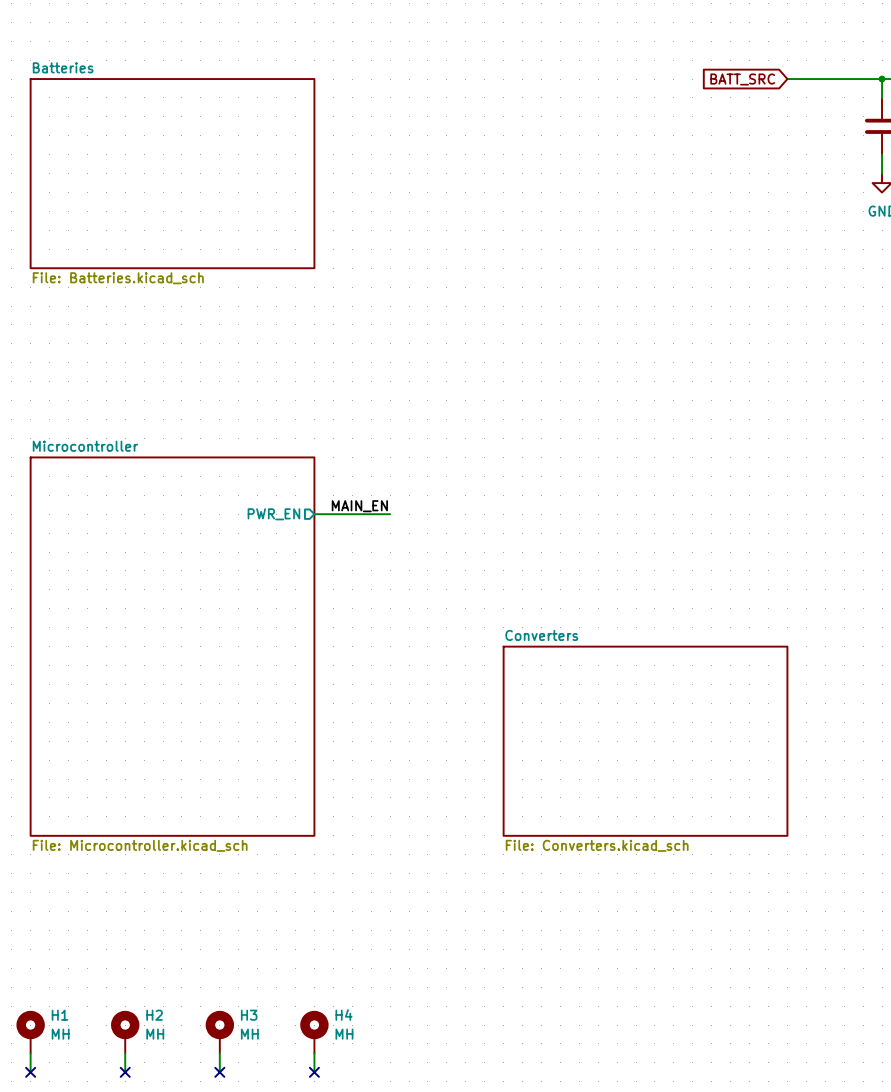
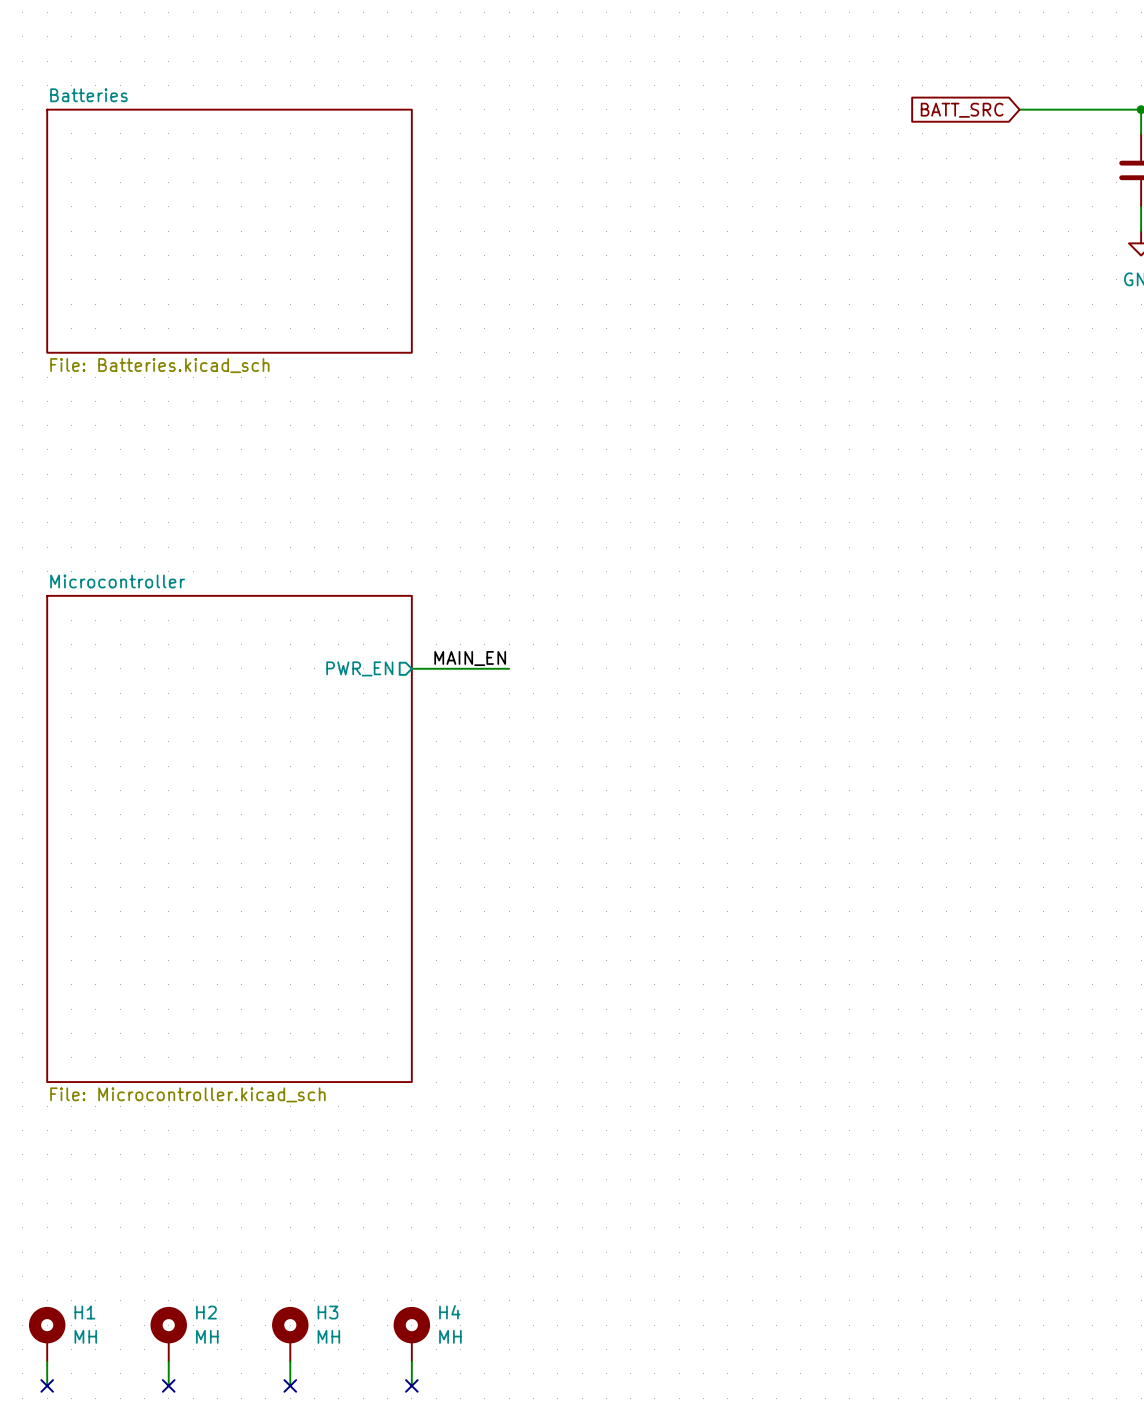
sheet Converters: File: Converters.kicad_sch (645, 741) -> none

